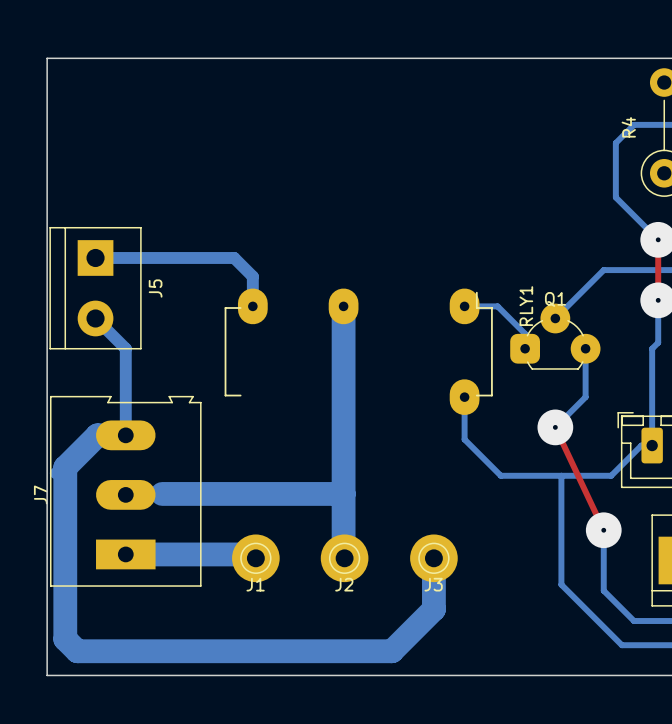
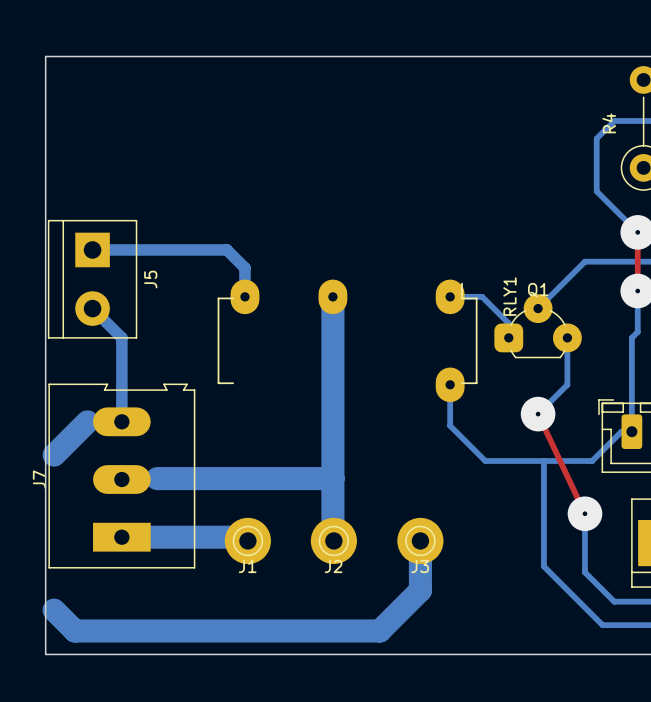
bottom track: (97, 435) (65, 467) (65, 639) -> (94, 421) (87, 421) (54, 455) (54, 458)
bottom track: none -> (54, 610) (63, 619)

